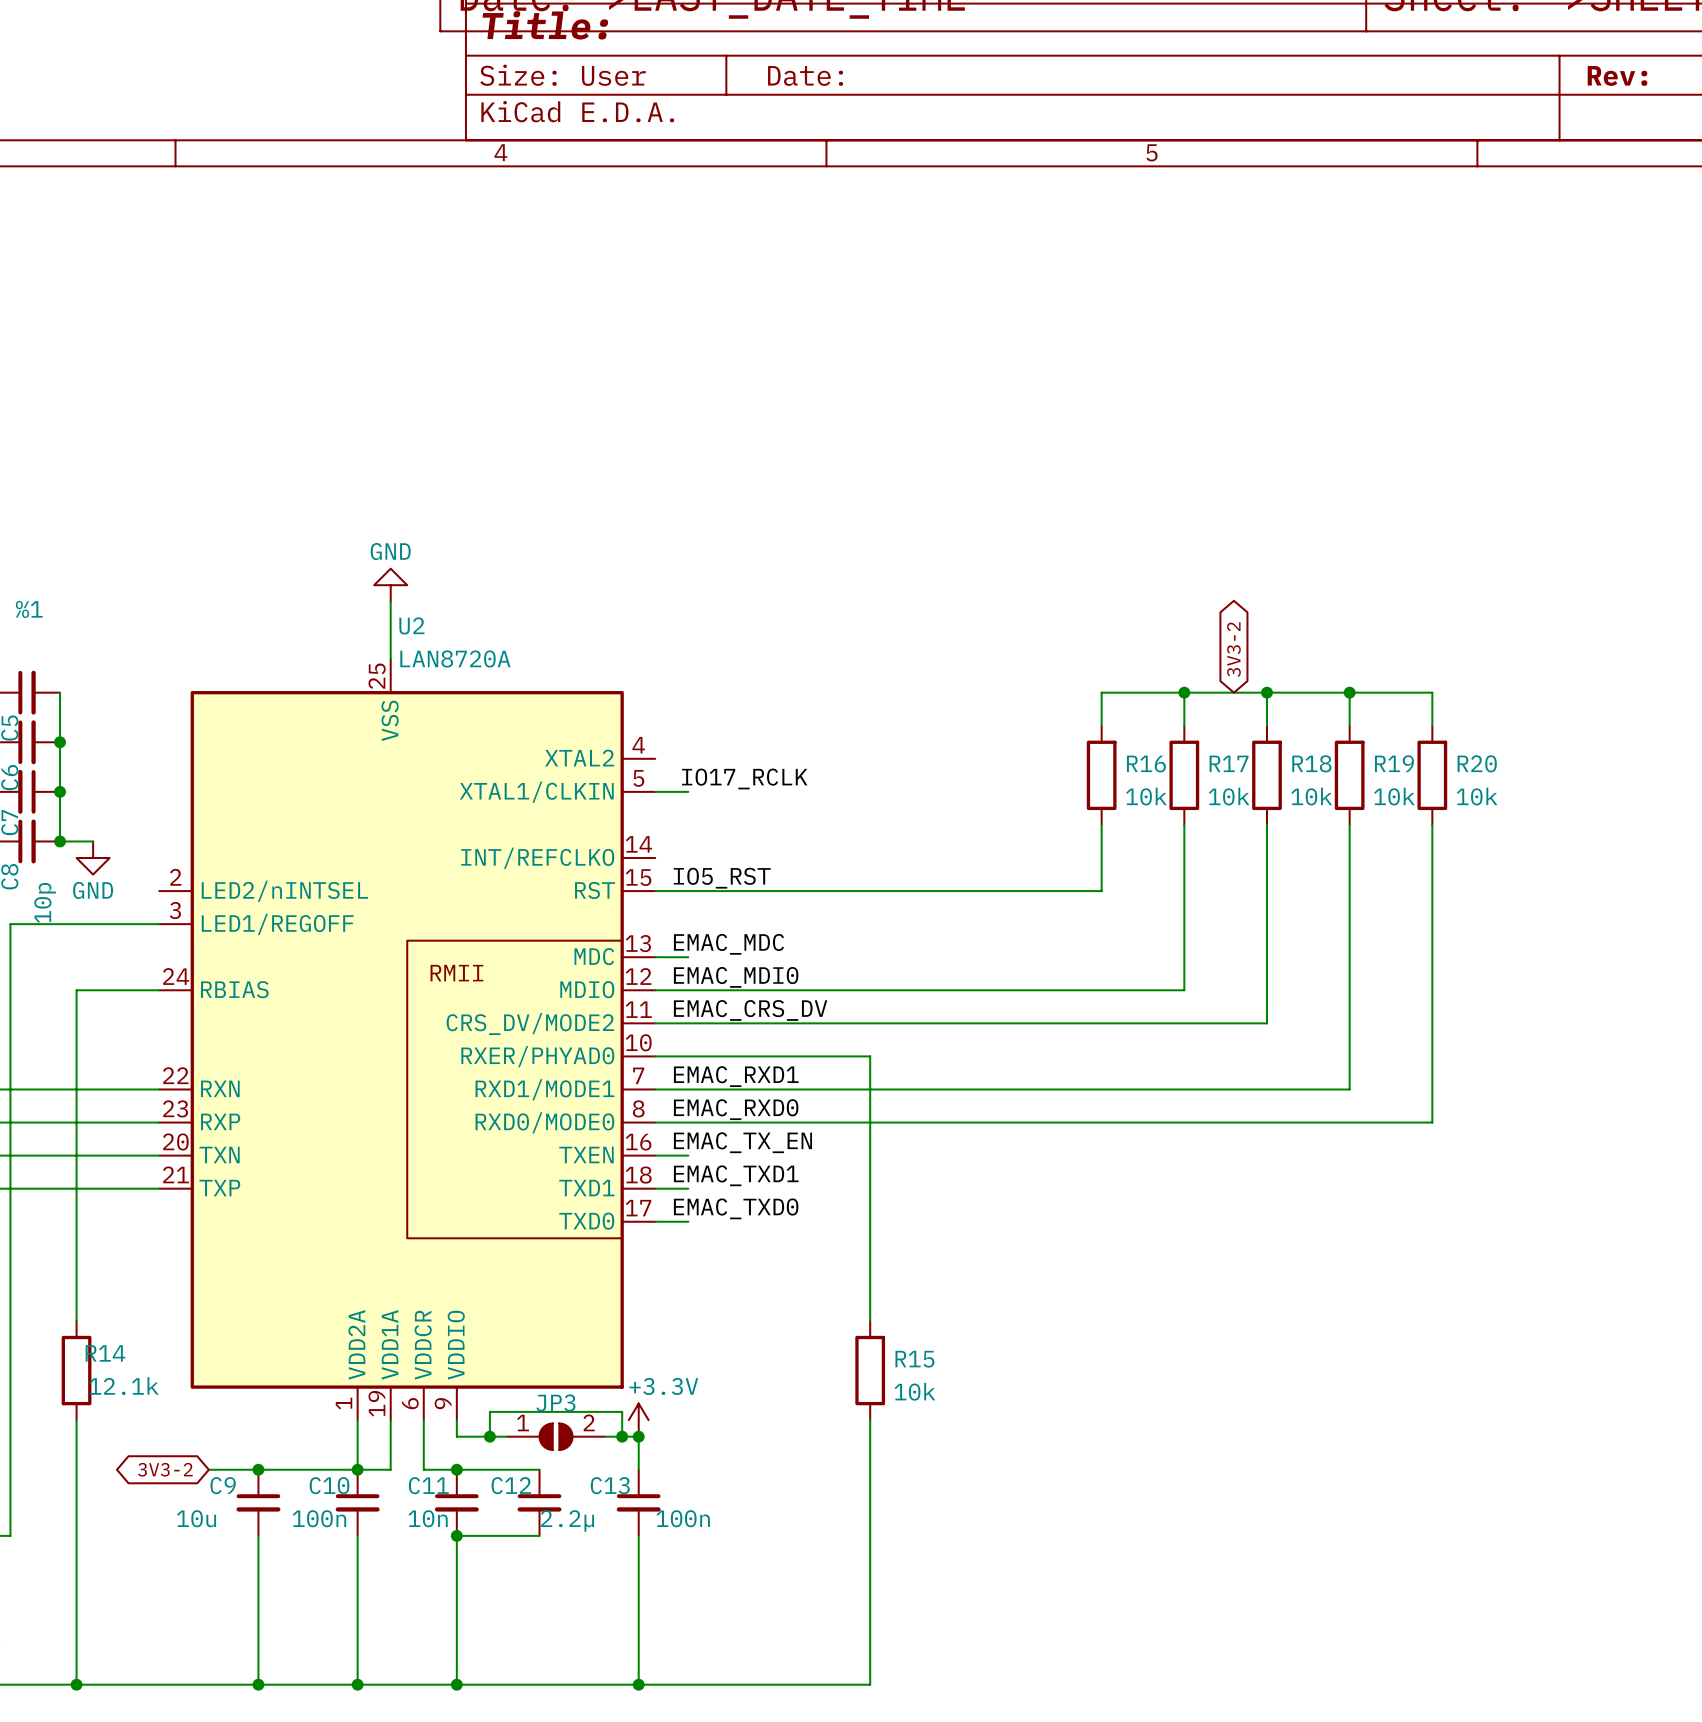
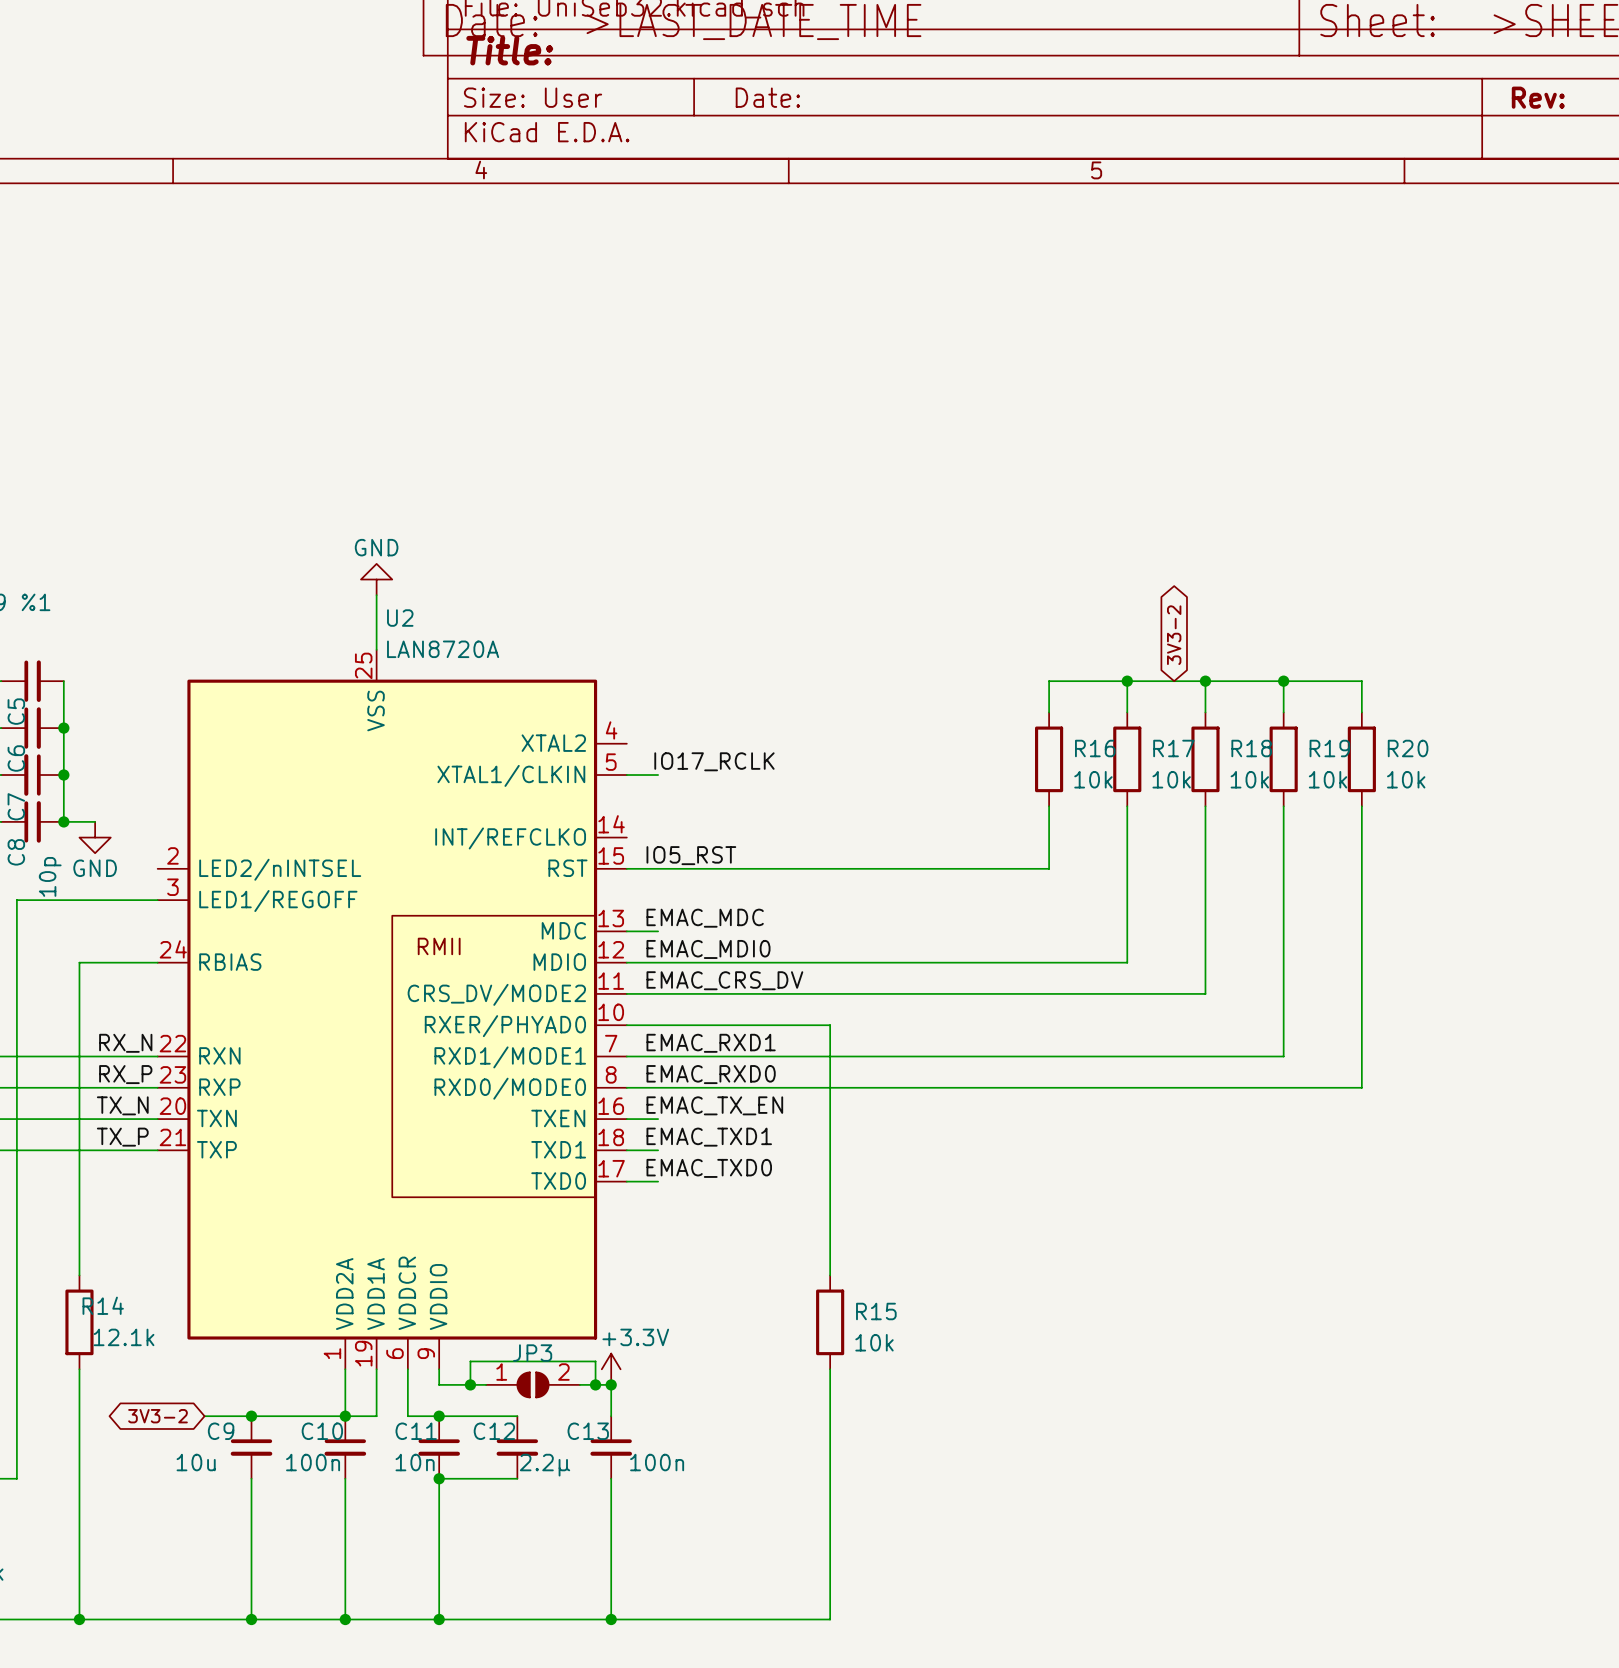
label: none -> RX_N (125, 1043)
label: none -> RX_P (125, 1074)
label: none -> TX_N (122, 1105)
label: none -> TX_P (122, 1137)

